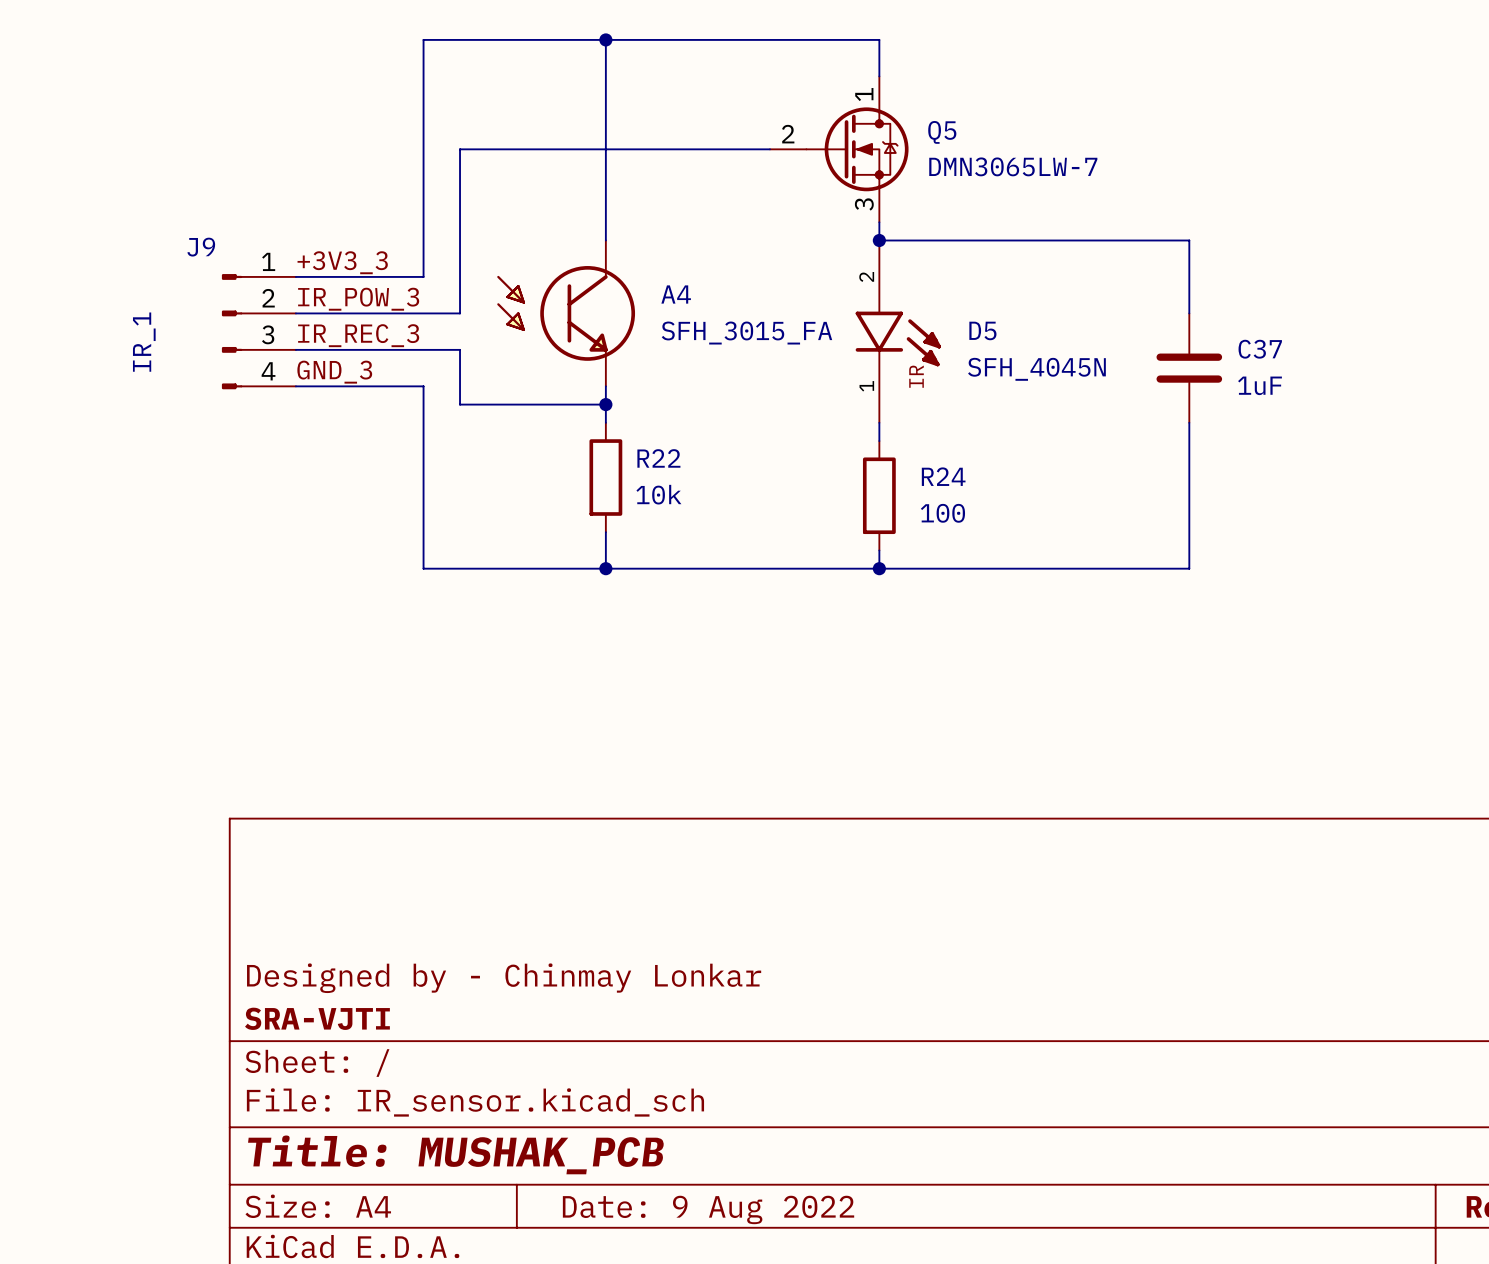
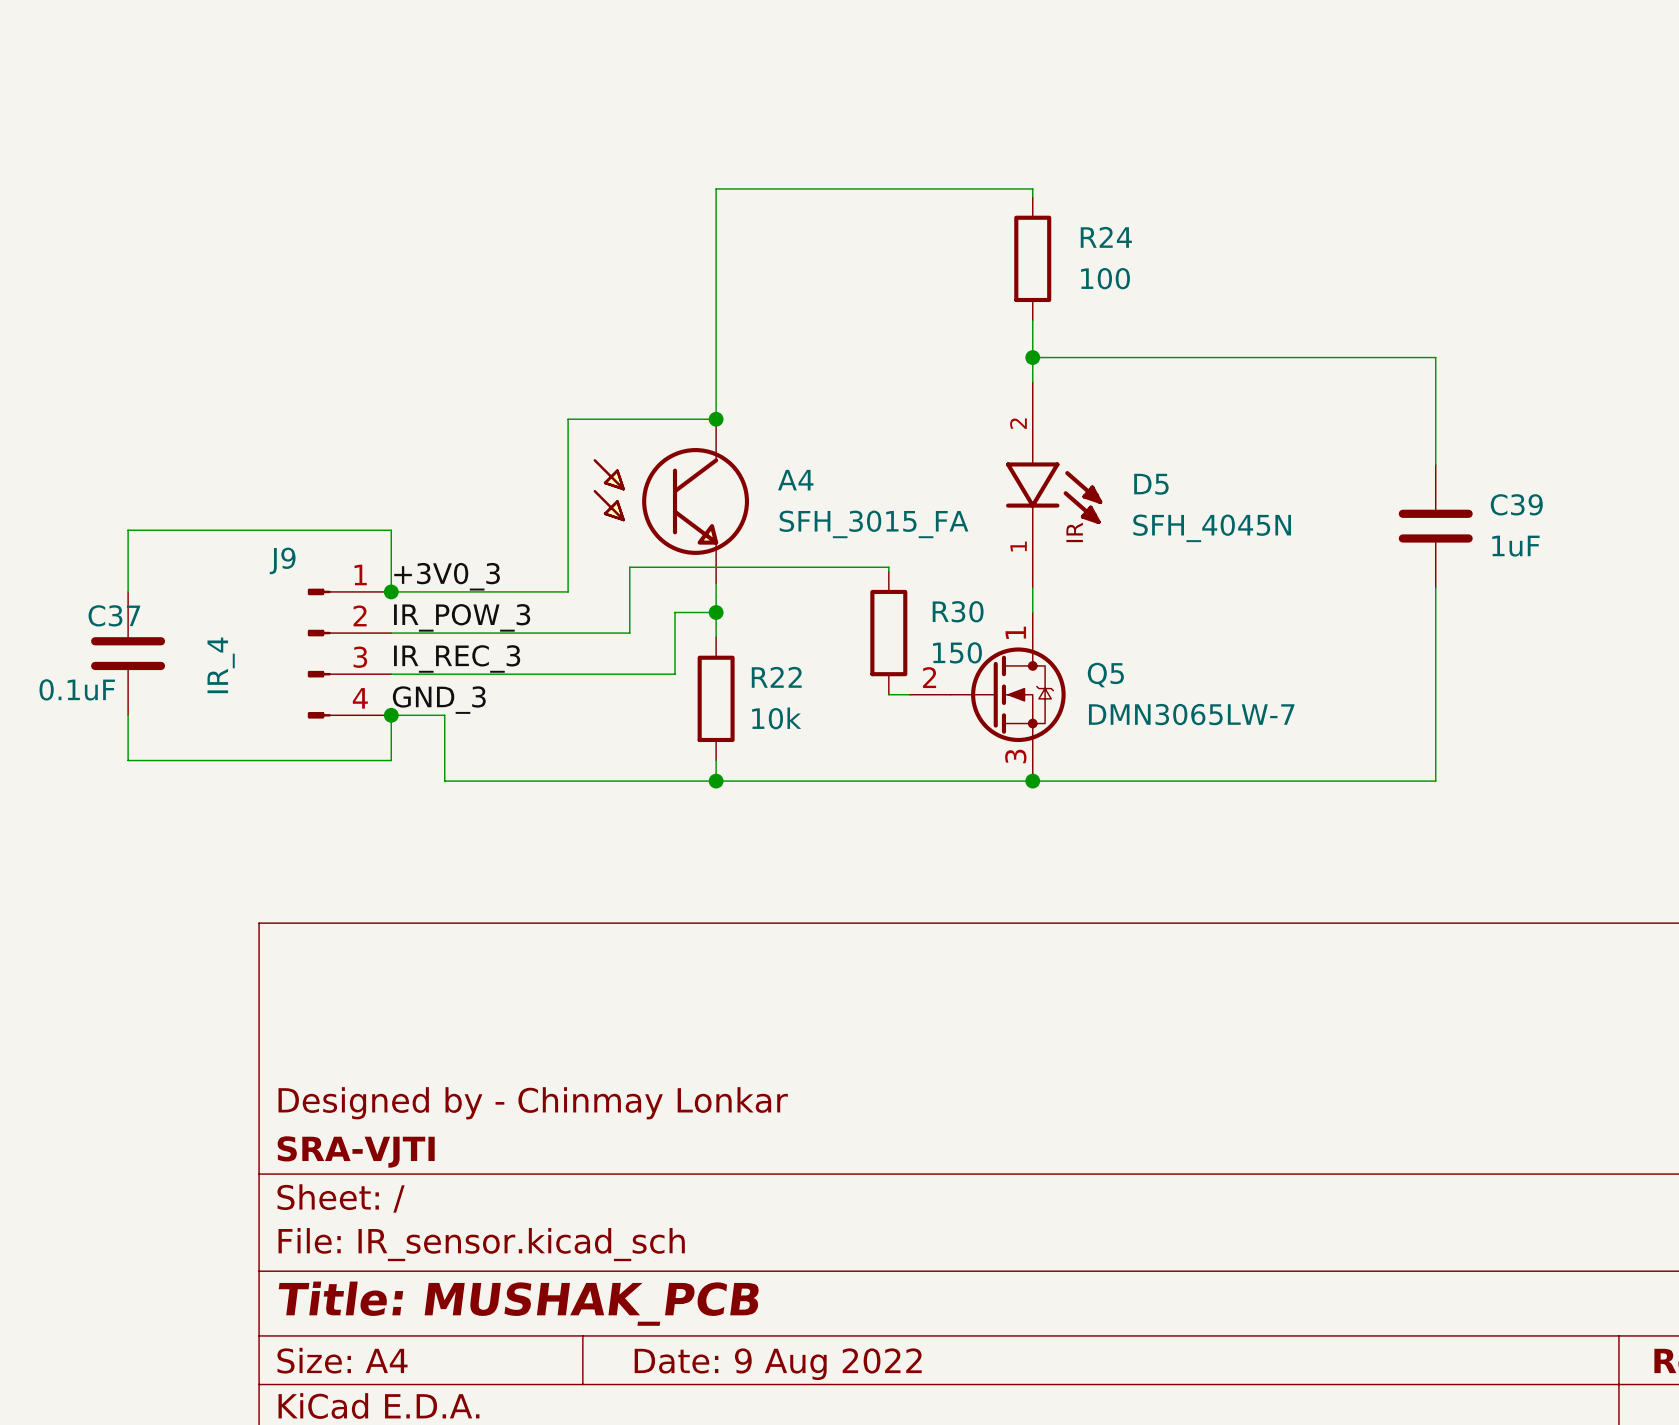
wire: (605, 39) (605, 240) -> none
junction: (605, 39) -> none
wire: (879, 76) (879, 39) (423, 39) (423, 276) (295, 276) -> none
wire: (769, 149) (460, 149) (460, 313) (295, 313) -> none
Q5 position: (839, 149) -> (987, 694)
wire: none -> (1032, 197) (1032, 188) (716, 188) (716, 419) (568, 419) (568, 591) (391, 591) (391, 530) (128, 530) (128, 591)
wire: (879, 222) (879, 240) (1189, 240) (1189, 313) -> none
junction position: (879, 240) -> (1032, 357)
label: +3V3_3 (342, 262) -> none
wire: none -> (1032, 320) (1032, 382)
label position: IR_POW_3 (358, 299) -> IR_POW_3 (462, 617)
A4 position: (566, 313) -> (671, 501)
wire: none -> (1032, 357) (1435, 357) (1435, 464)
J9 position: (258, 331) -> (349, 653)
D5 position: (898, 331) -> (1054, 485)
label position: IR_REC_3 (358, 335) -> IR_REC_3 (457, 658)
J9 value: IR_1 (144, 342) -> IR_4 (221, 665)
wire: (295, 349) (460, 349) (460, 404) (605, 404) -> none
C37 name position: C37 (1260, 349) -> C37 (114, 615)
C37 position: (1189, 368) -> (128, 653)
label position: GND_3 (334, 372) -> GND_3 (439, 700)
C37 value: 1uF (1260, 385) -> 0.1uF (77, 689)
wire: (295, 386) (423, 386) (423, 568) (1189, 568) (1189, 422) -> none
wire: (605, 386) (605, 422) -> none
junction position: (605, 404) -> (716, 419)
wire: (879, 422) (879, 441) -> none
C39: none -> 1uF (1435, 526)
R22 position: (605, 477) -> (716, 698)
R24 position: (879, 495) -> (1032, 258)
wire: none -> (888, 571) (888, 567) (629, 567) (629, 633) (391, 633)
label: none -> +3V0_3 (447, 576)
wire: none -> (716, 583) (716, 637)
wire: none -> (1032, 587) (1032, 612)
wire: none -> (1435, 587) (1435, 781) (444, 781) (444, 715) (391, 715) (391, 760) (128, 760) (128, 715)
junction: none -> (391, 591)
wire: (605, 532) (605, 568) -> none
wire: none -> (716, 612) (675, 612) (675, 674) (391, 674)
wire: (879, 550) (879, 568) -> (716, 760) (716, 781)
R30: none -> 150 (888, 633)
junction position: (605, 568) -> (716, 612)
junction: (879, 568) -> none
wire: none -> (888, 694) (909, 694)
junction: none -> (391, 715)
junction: none -> (716, 781)
junction: none -> (1032, 781)

